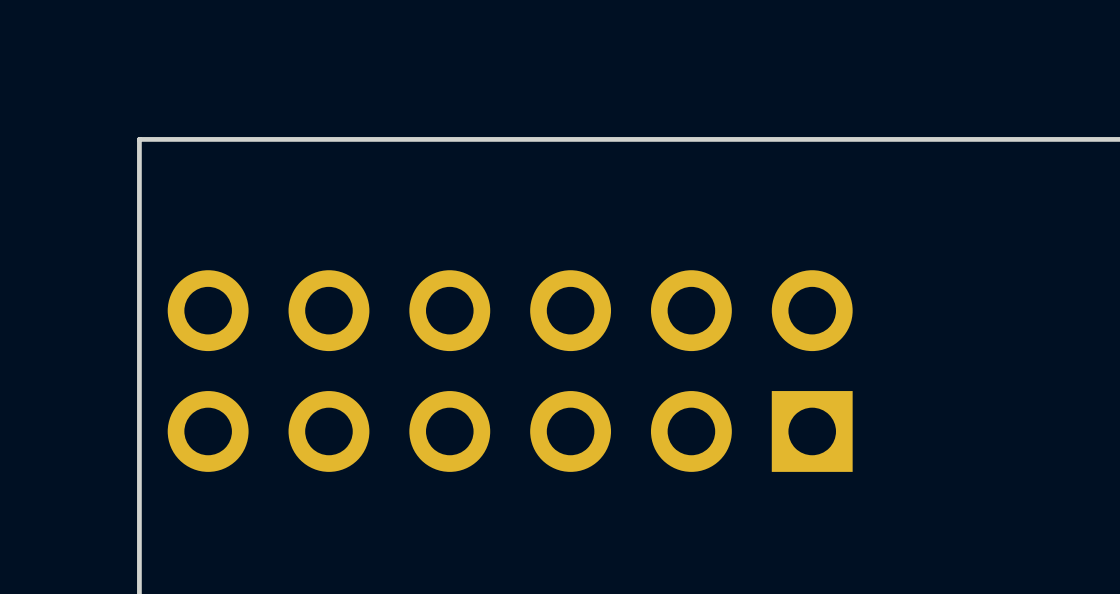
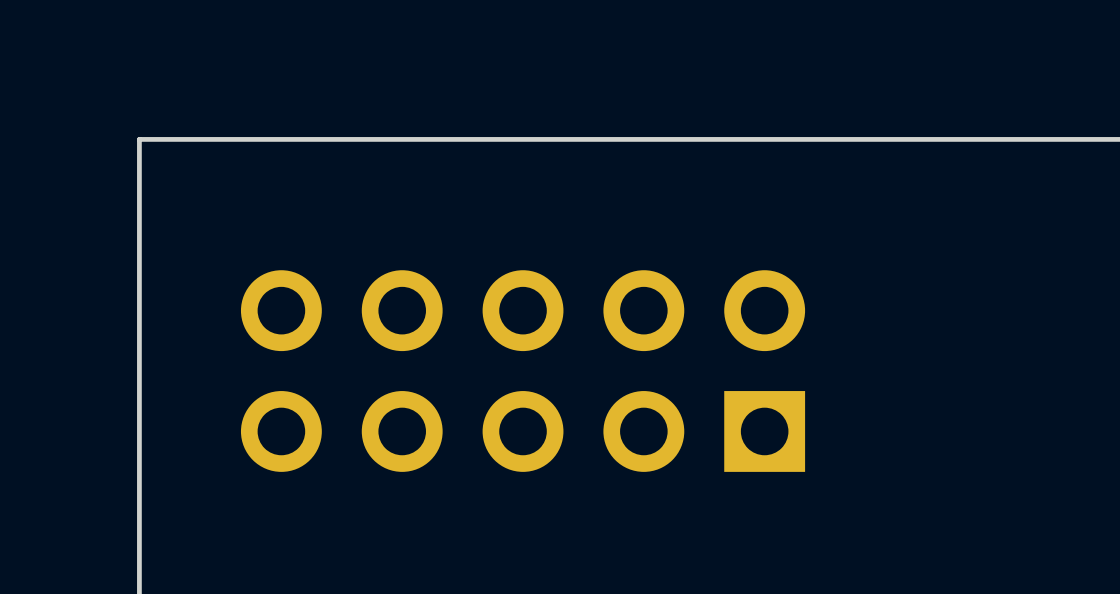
part footprint: [167, 270, 853, 472] -> [240, 270, 806, 472]

